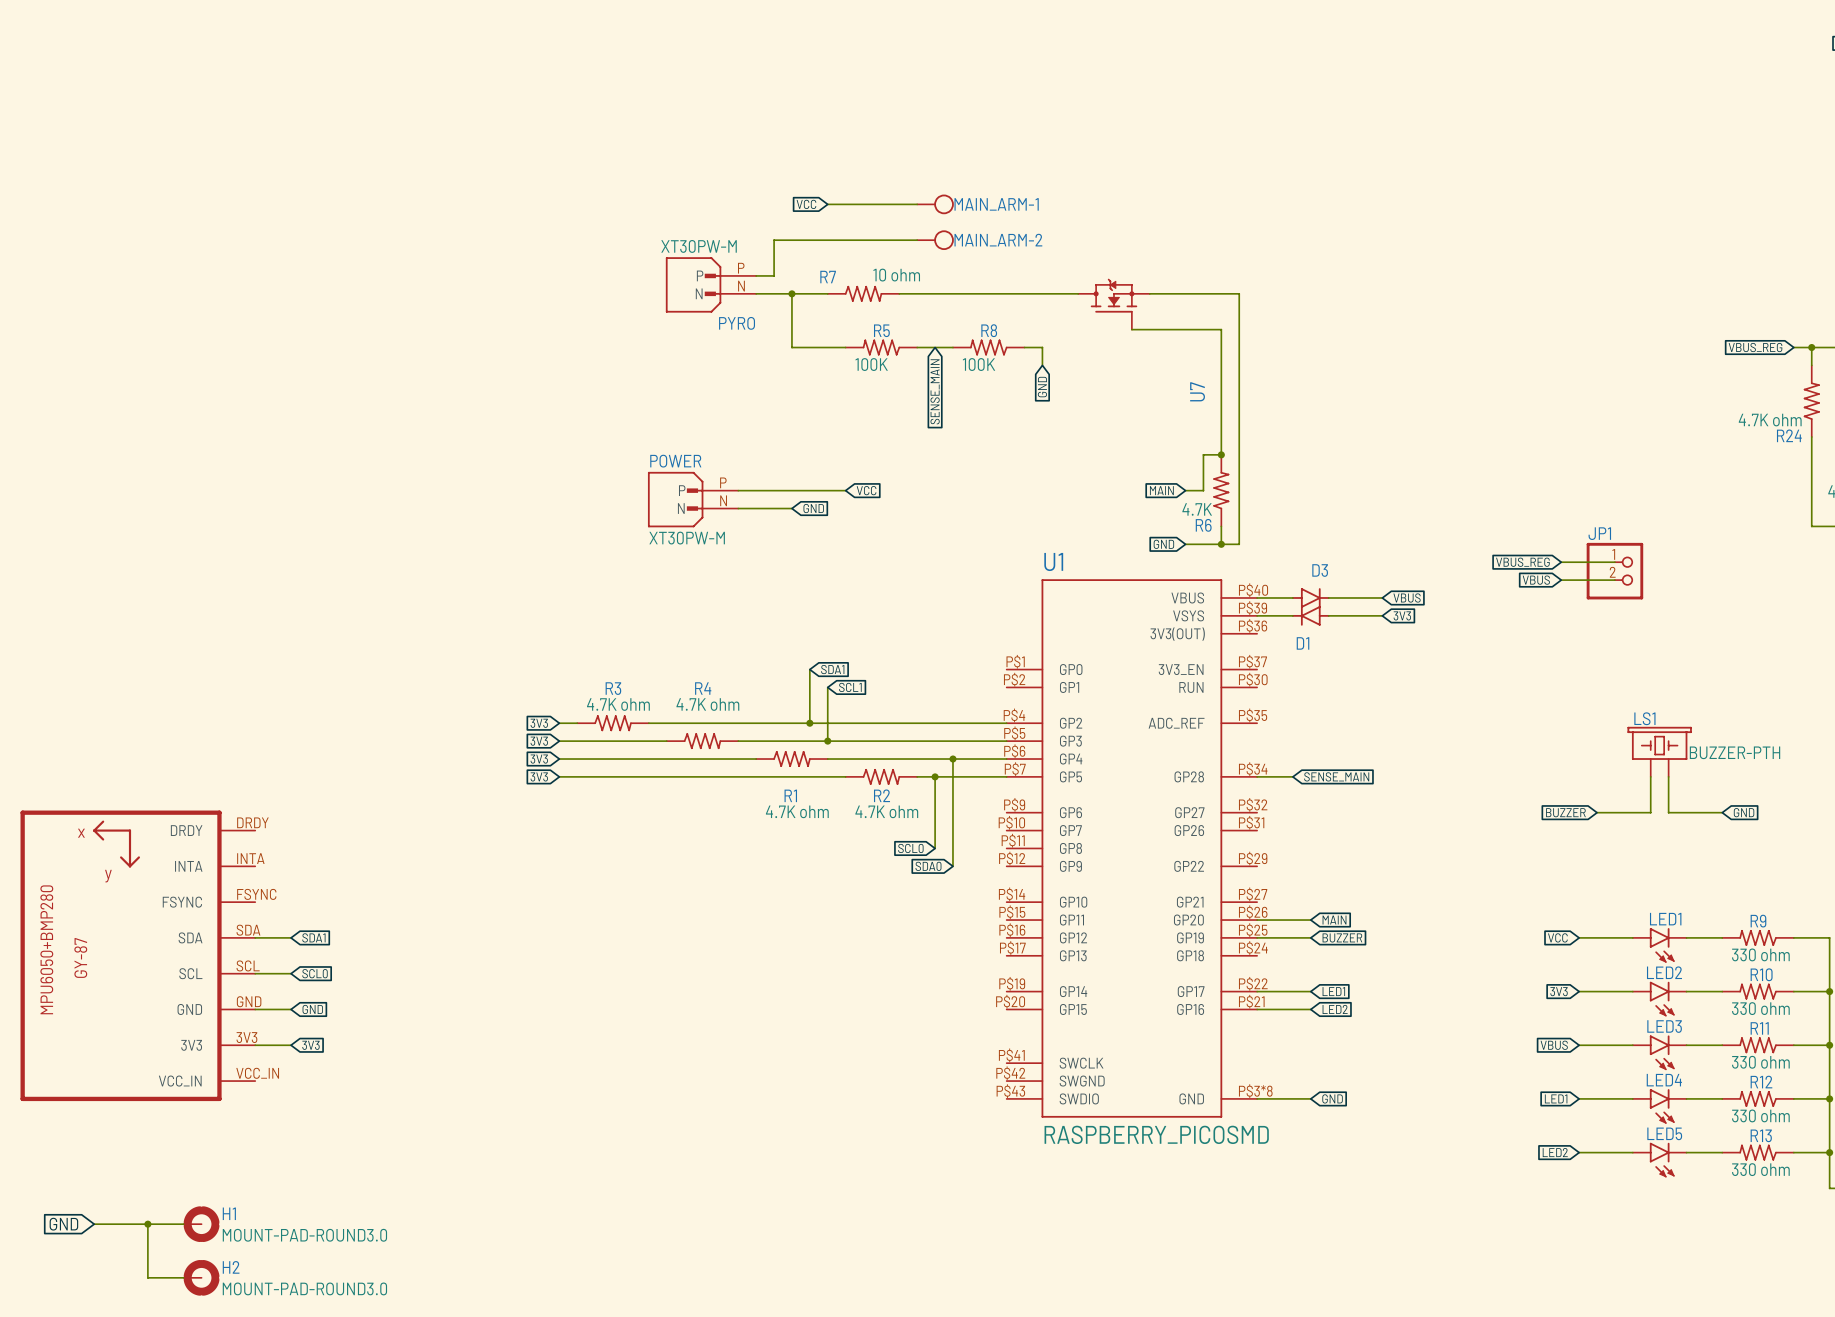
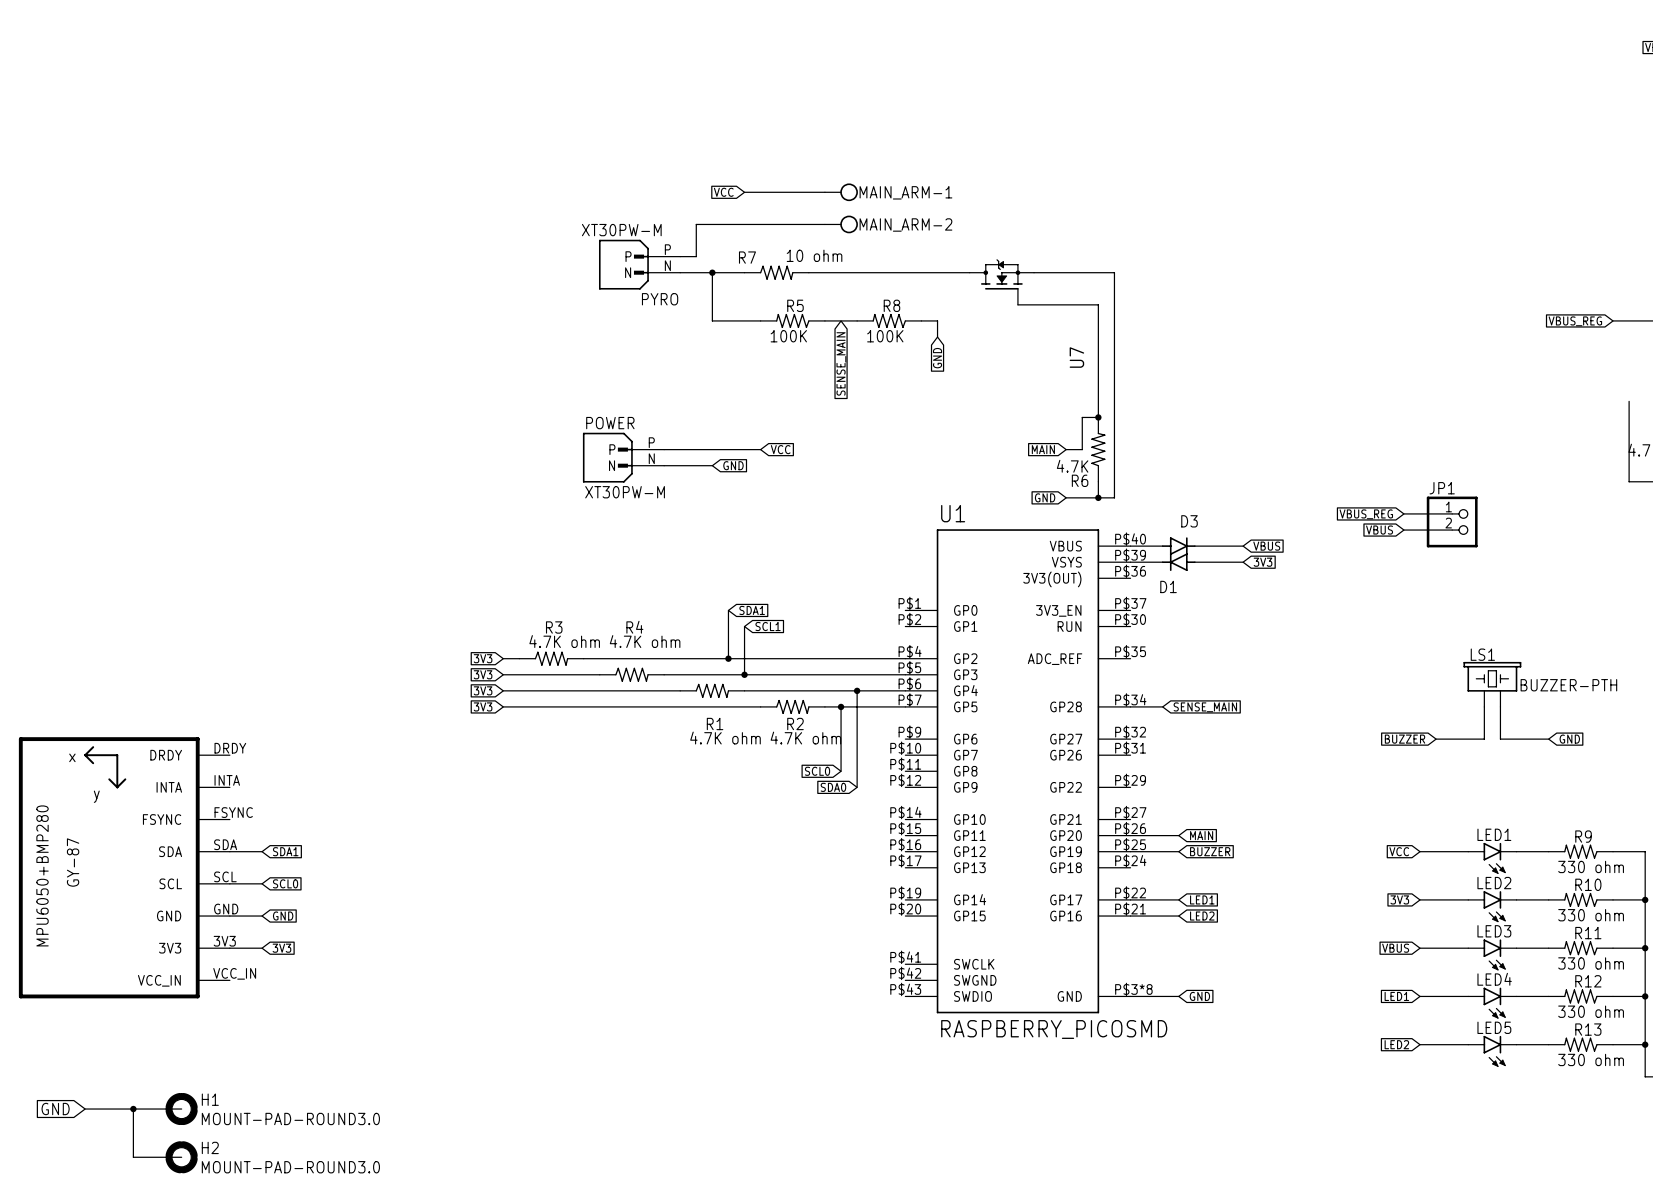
wire: (1811, 347) (1811, 365) -> none
junction: (1811, 347) -> none
R24: 4.7K ohm (1811, 401) -> none

